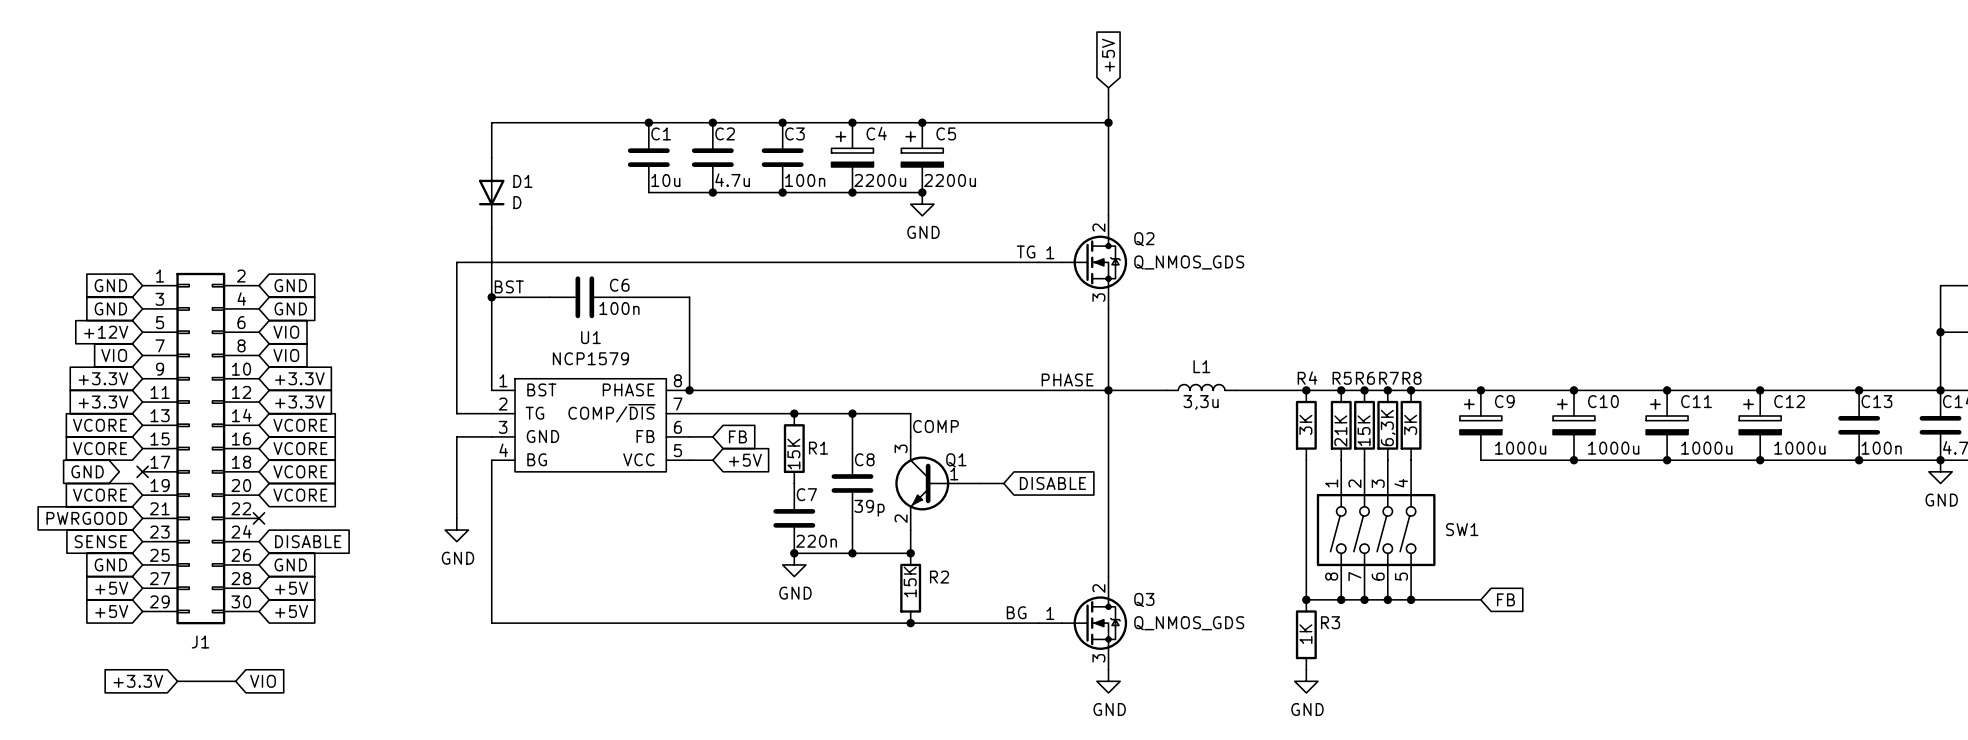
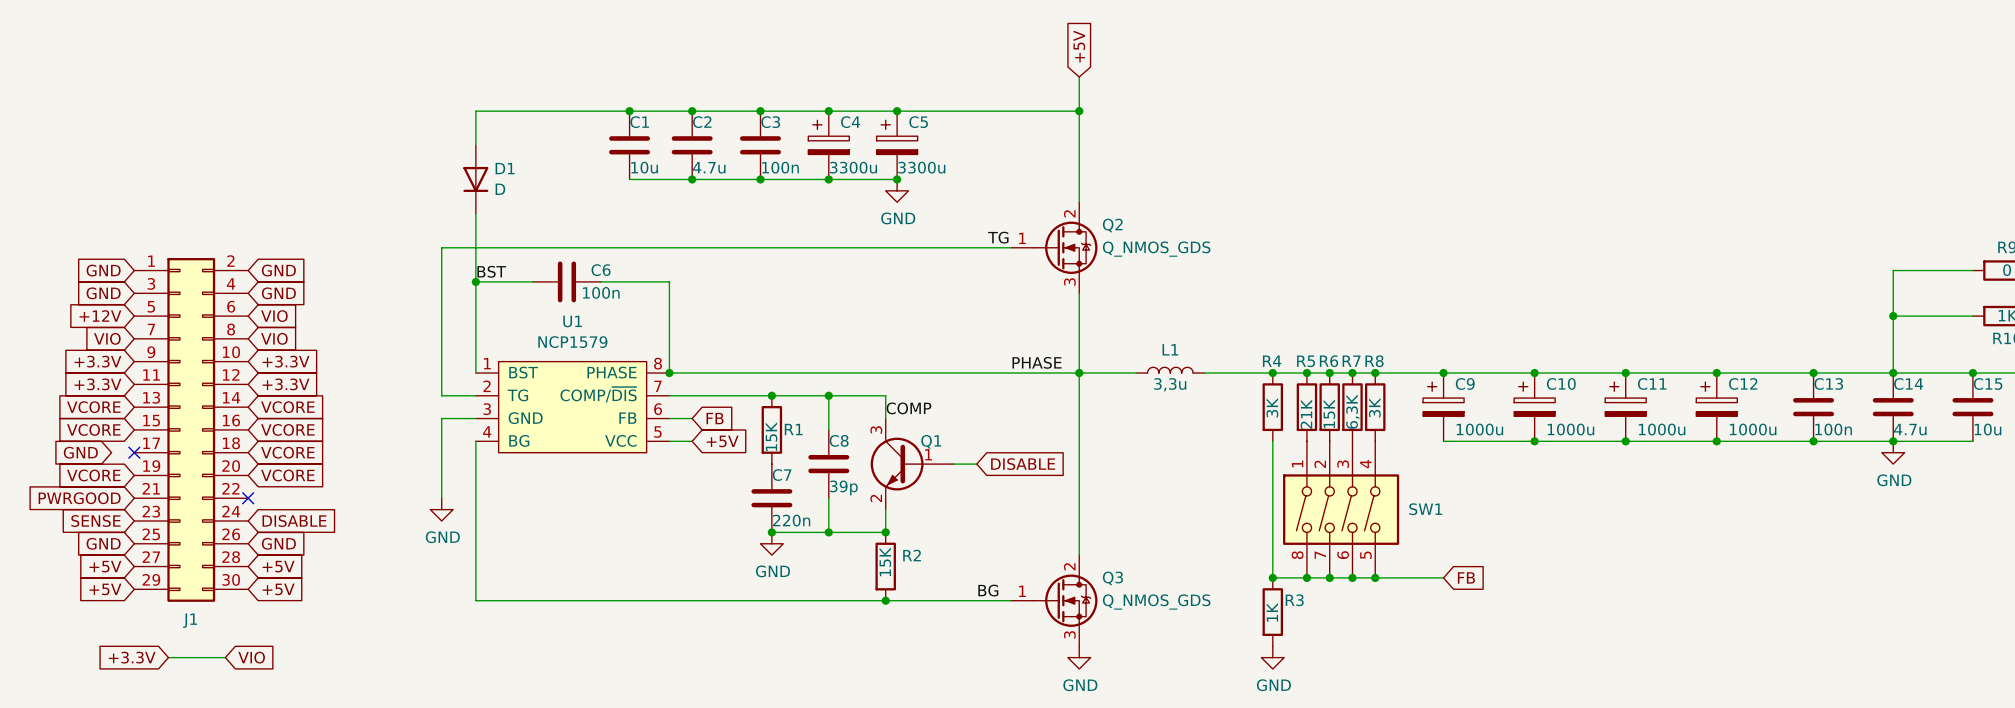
C4 value: 2200u (880, 180) -> 3300u (853, 167)
C5 value: 2200u (950, 180) -> 3300u (921, 167)

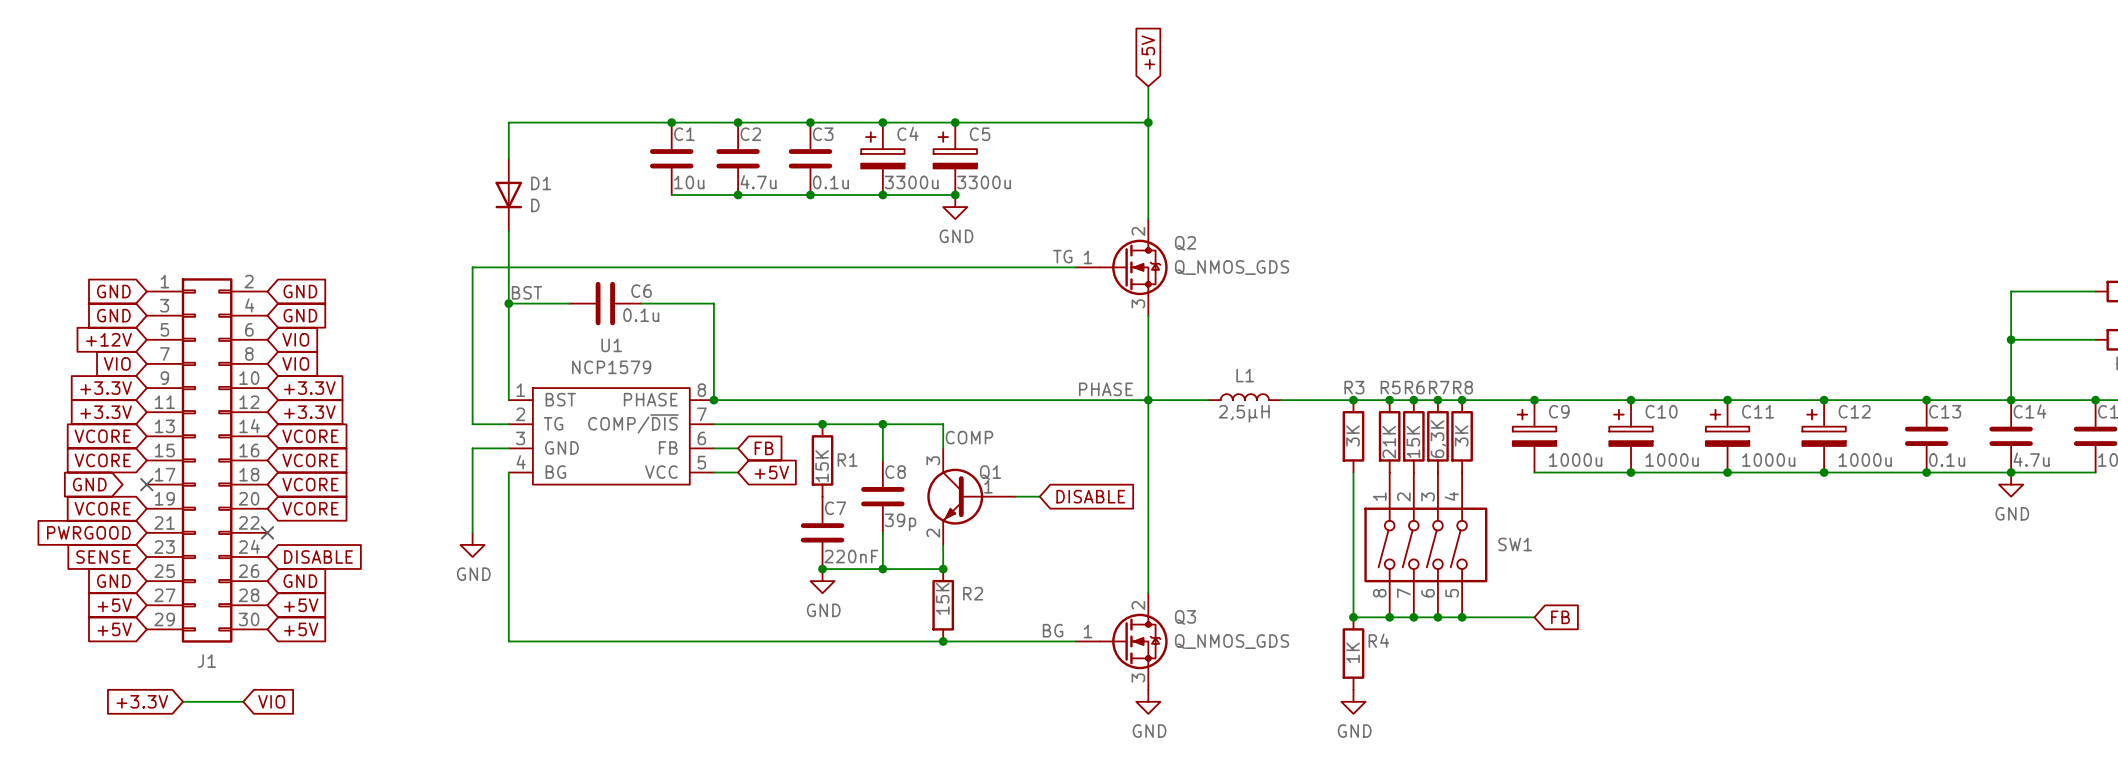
C3 value: 100n (780, 167) -> 0.1u (830, 182)
C6 value: 100n (601, 292) -> 0.1u (641, 315)
R4 name: R4 (1272, 361) -> R3 (1354, 387)
L1 value: 3,3u (1170, 384) -> 2,5µH (1244, 413)
C13 value: 100n (1833, 429) -> 0.1u (1947, 460)
C7 value: 220n (791, 520) -> 220nF (851, 556)
R3 name: R3 (1294, 600) -> R4 (1378, 640)

